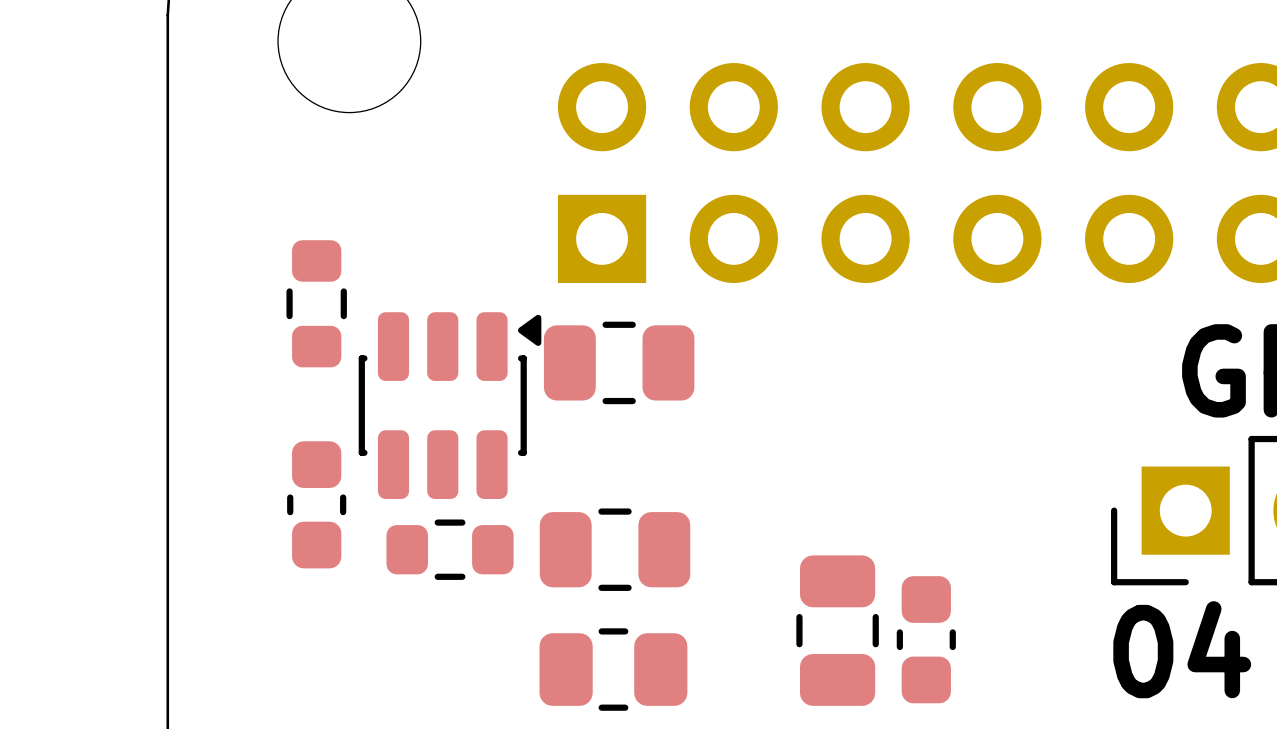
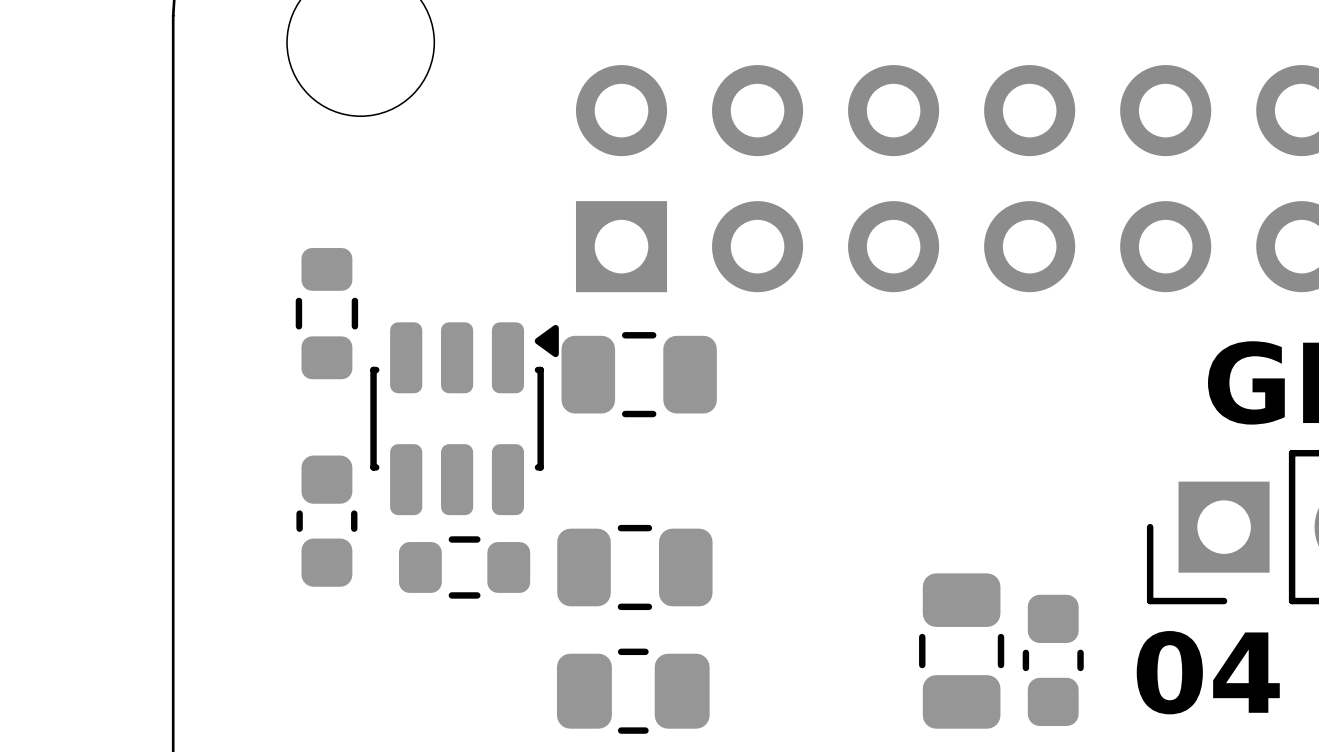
part footprint: [896, 576, 956, 704] -> [919, 573, 1005, 729]
part: (837, 630) -> none
part: none -> (1053, 660)

